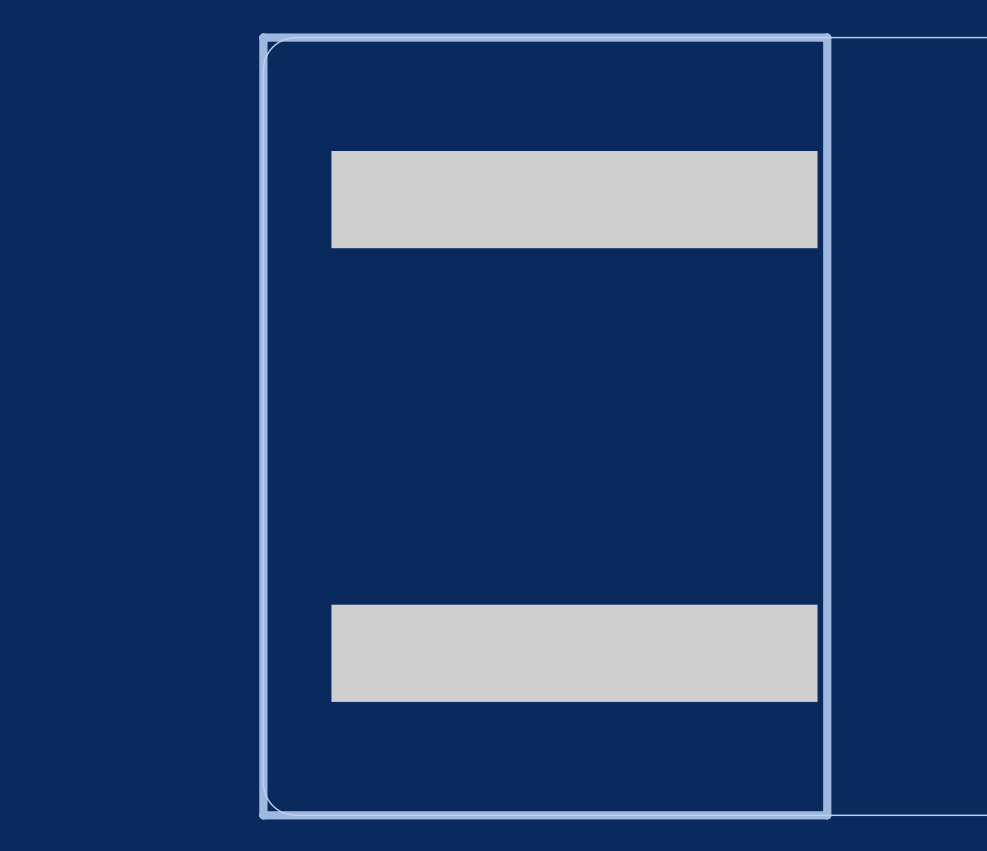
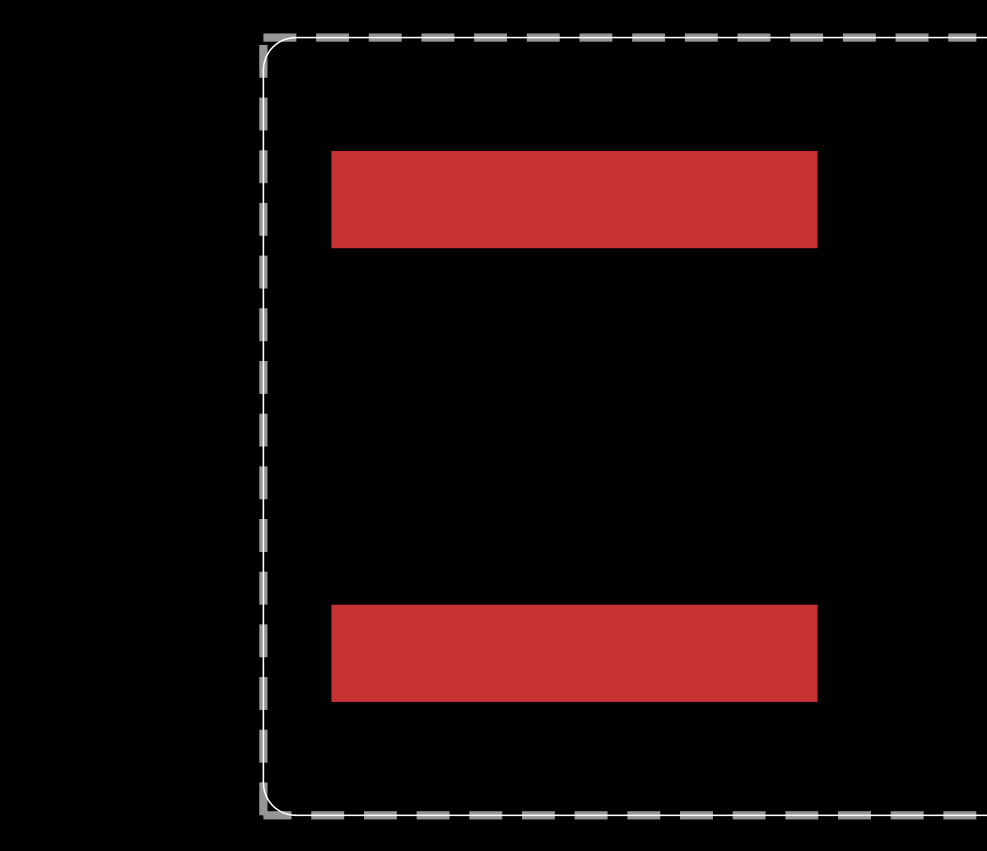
part: (545, 426) -> none
part: none -> (619, 426)

